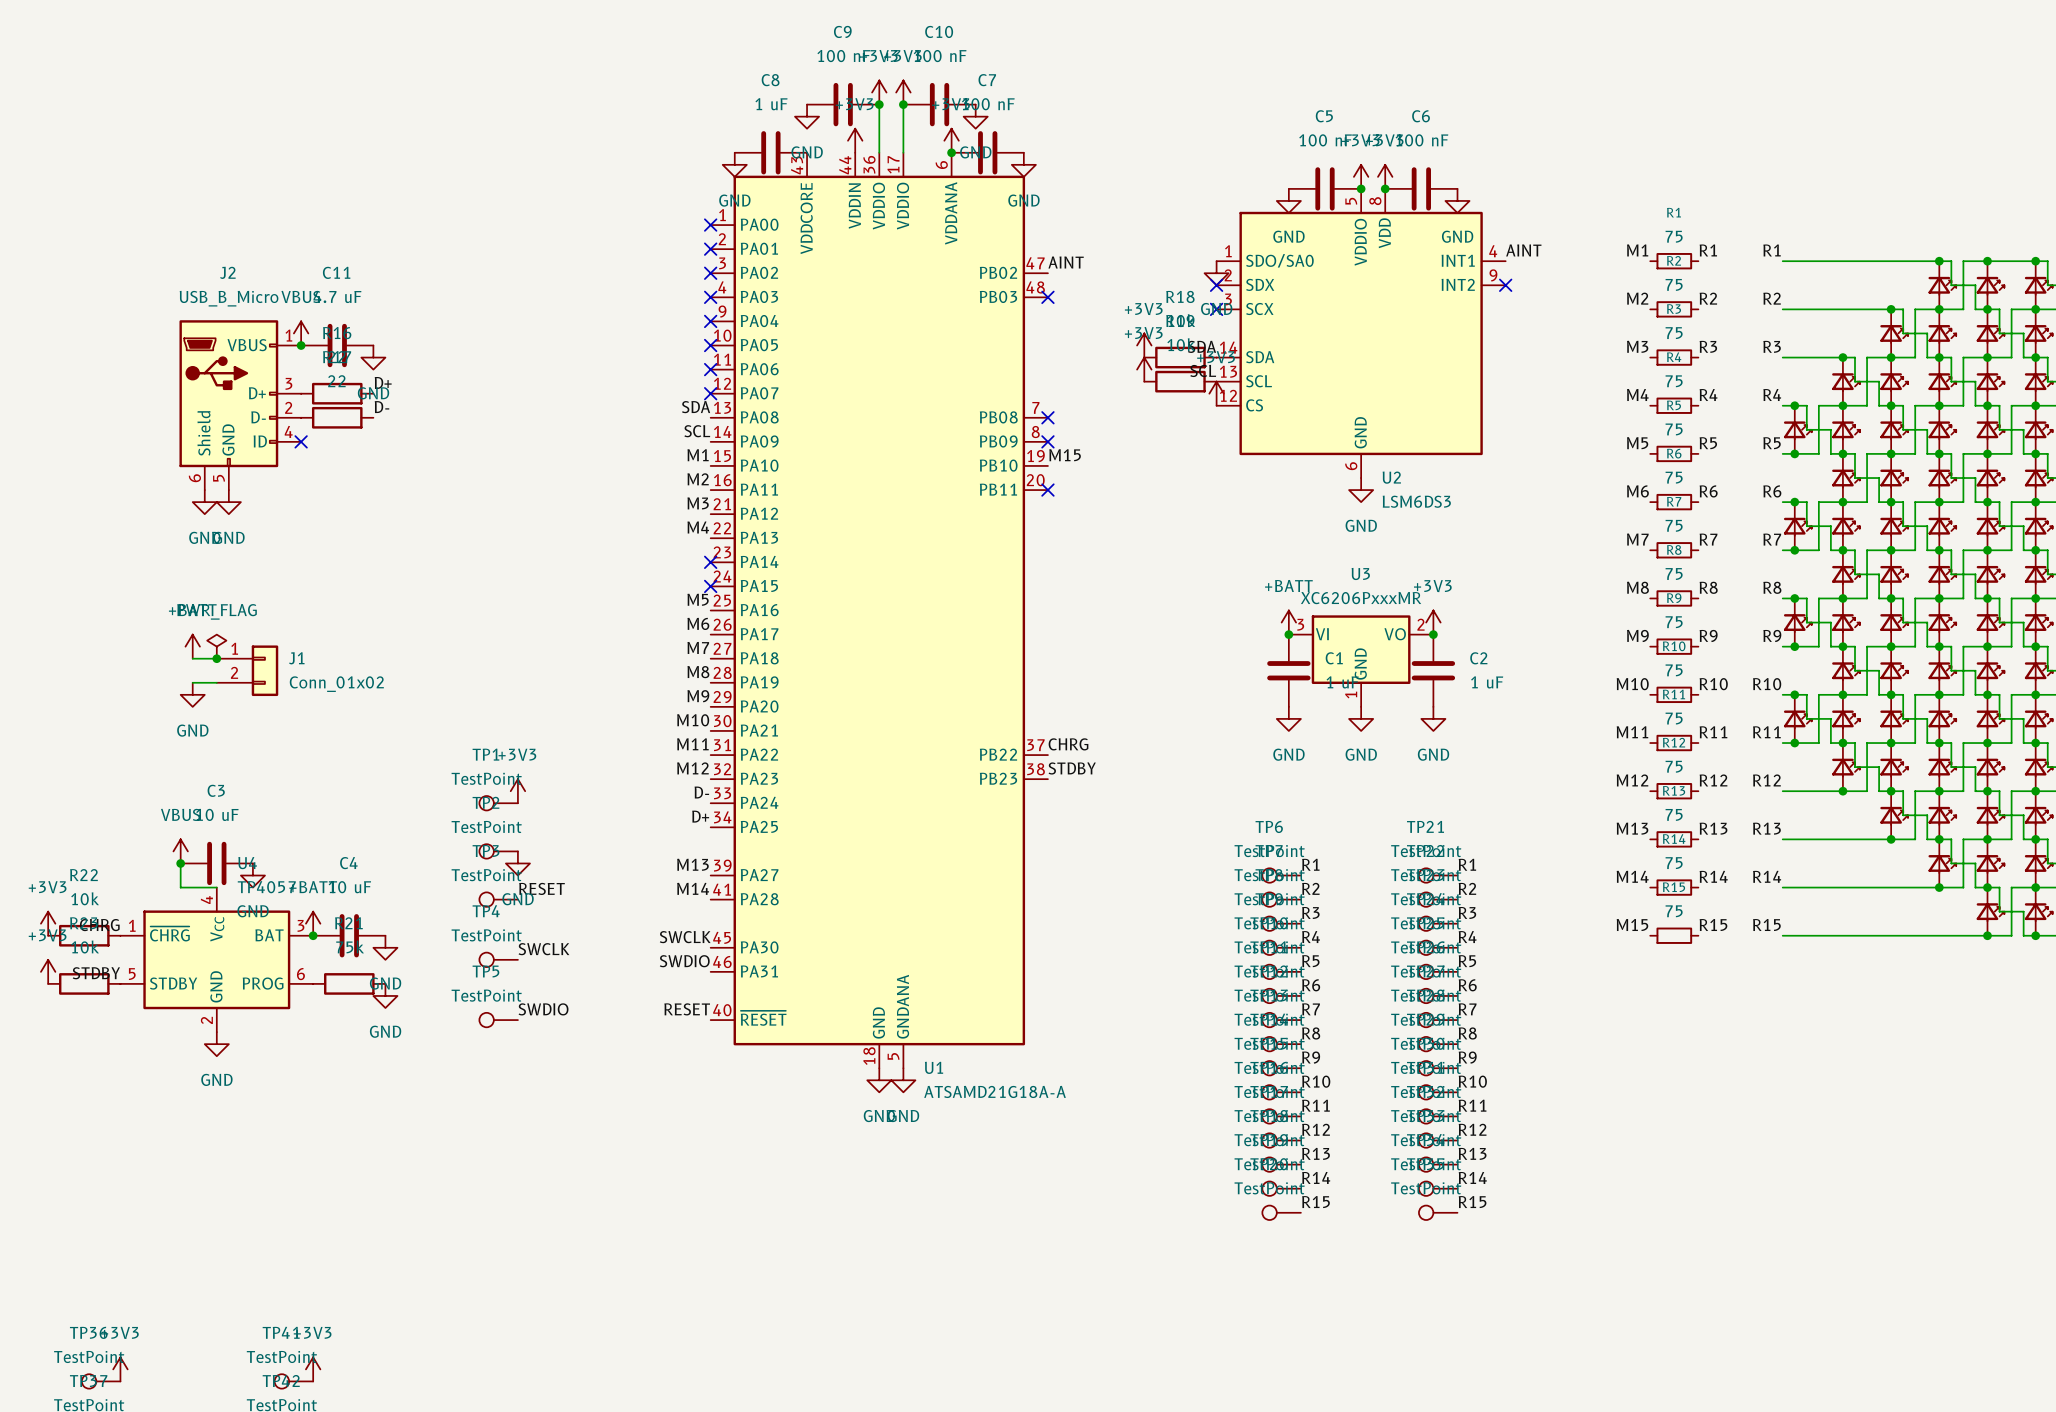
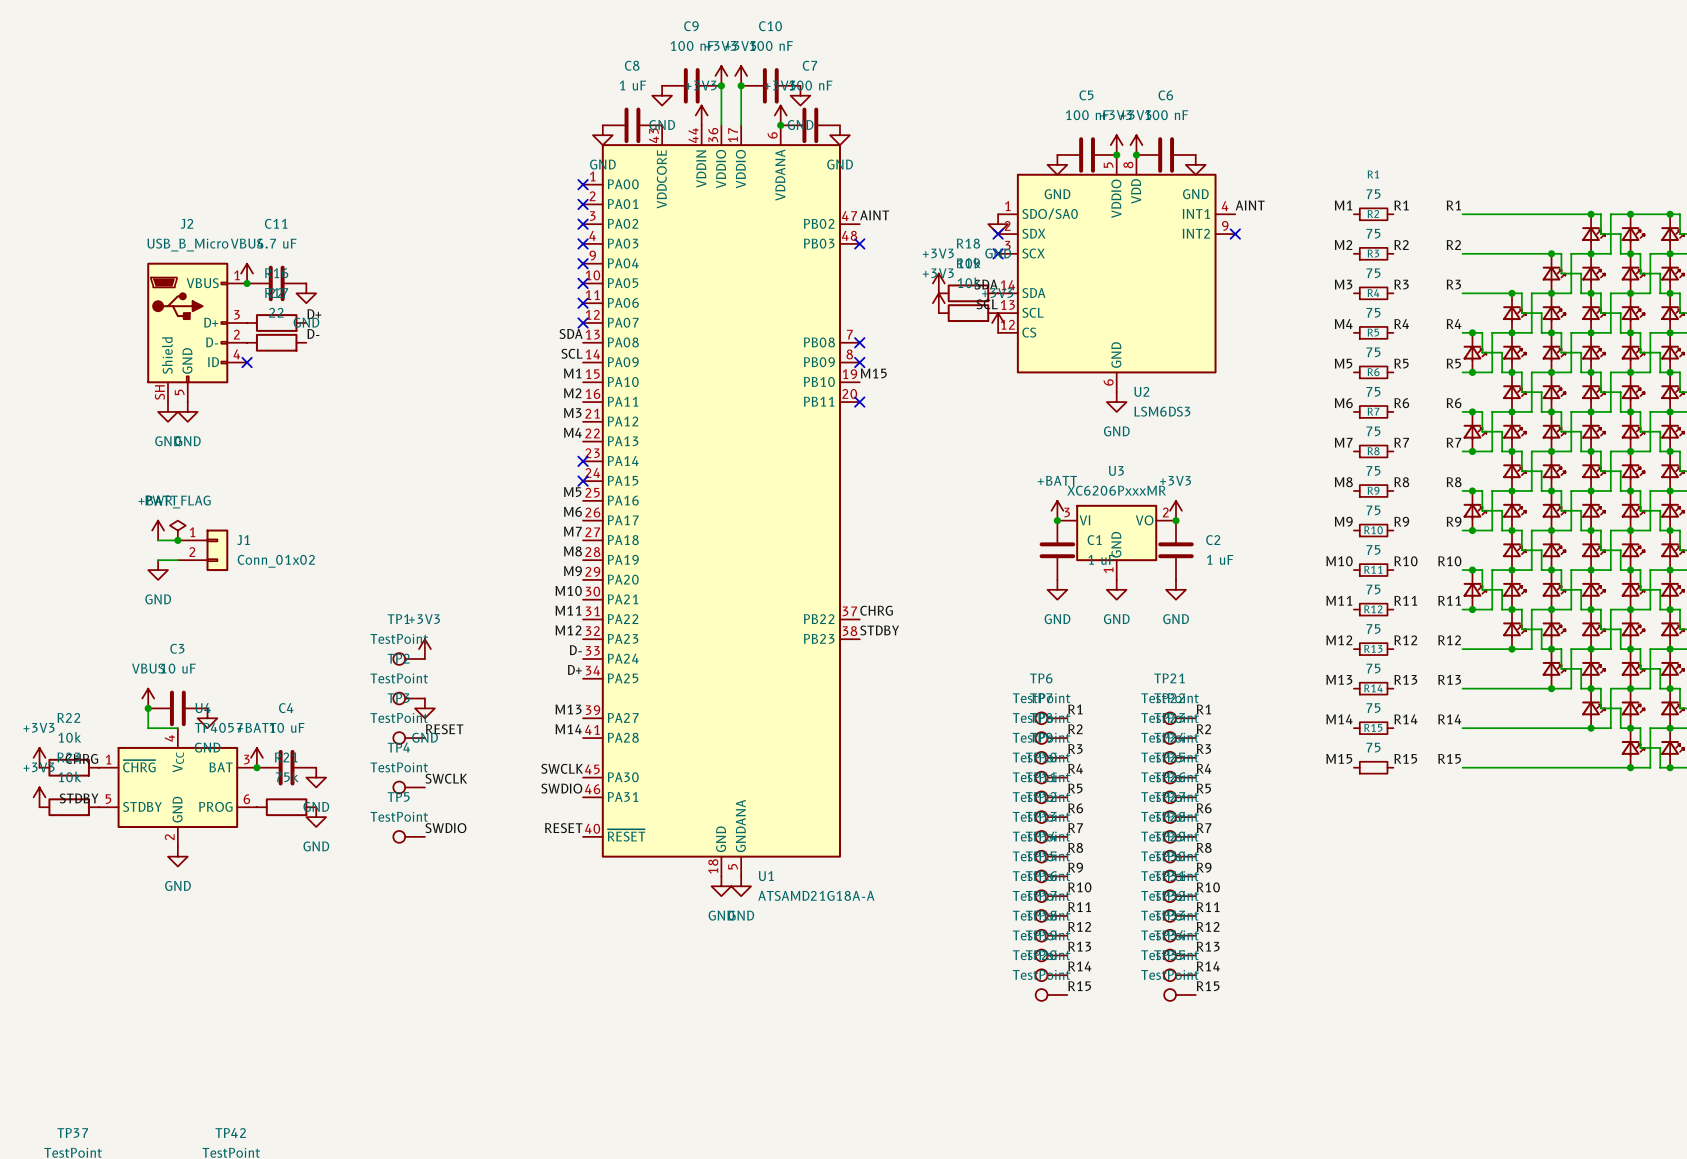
J2 pin number: 6 (194, 478) -> SH (159, 392)
power symbol: +3V3 (120, 1369) -> none
power symbol: +3V3 (313, 1369) -> none
TP36: TestPoint (101, 1381) -> none
TP41: TestPoint (293, 1381) -> none

